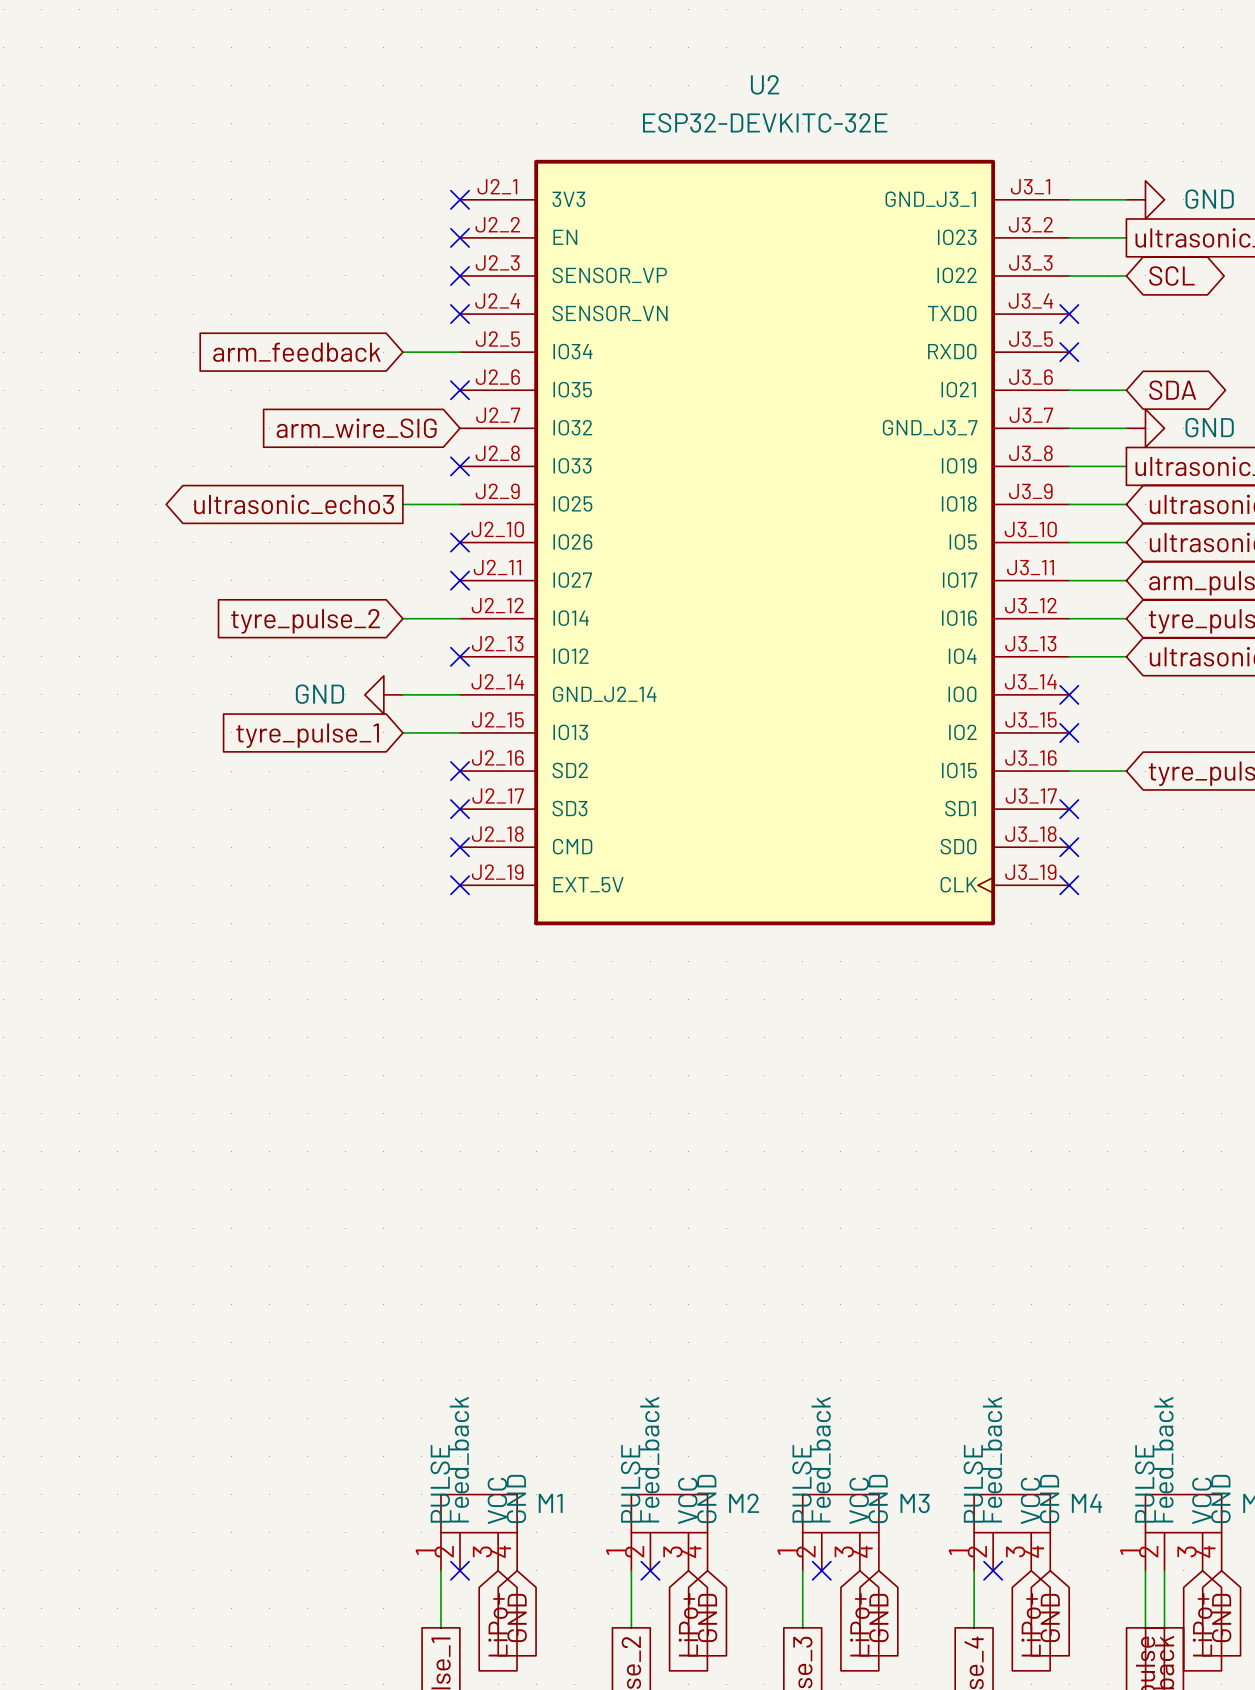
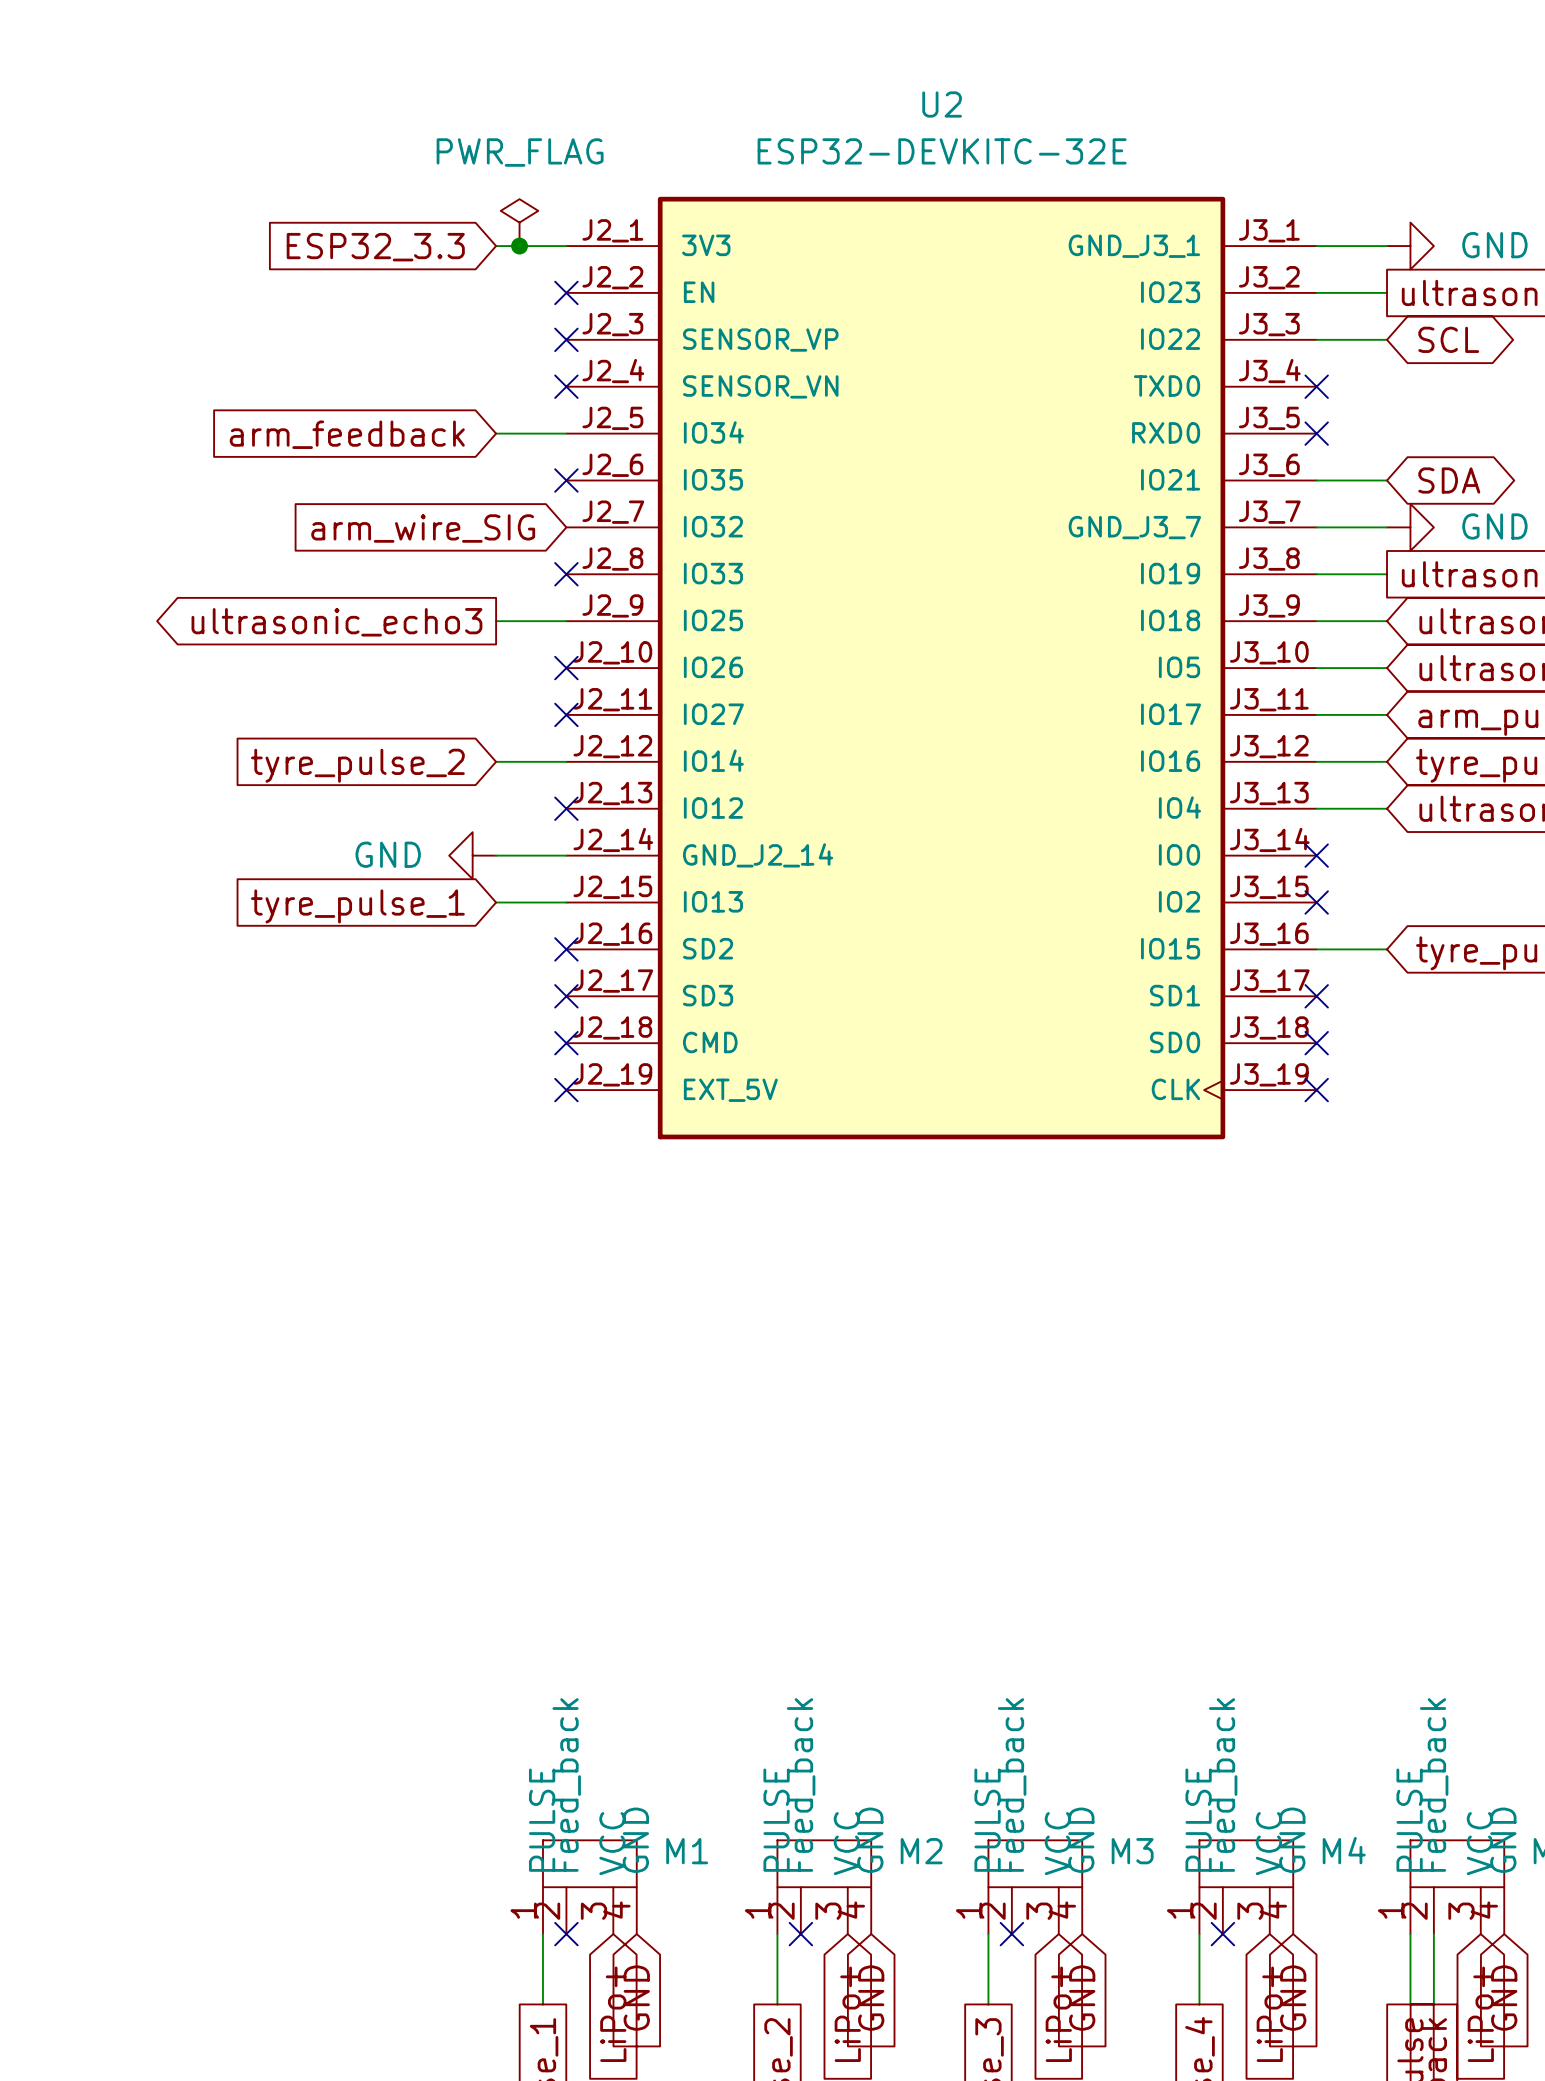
power symbol: none -> PWR_FLAG (519, 222)
global label: none -> ESP32_3.3 (375, 247)
wire: none -> (496, 246) (566, 246)
junction: none -> (519, 246)
no-connect mark: (460, 199) -> none

